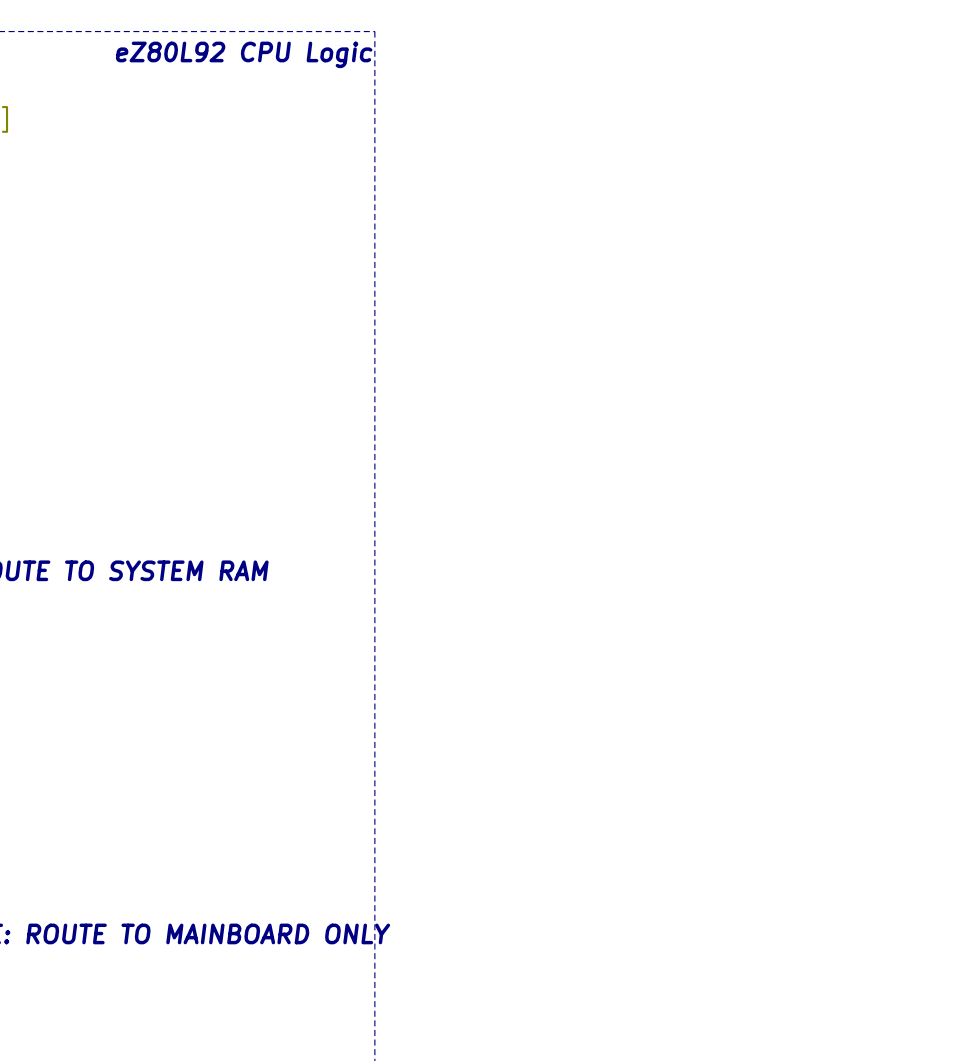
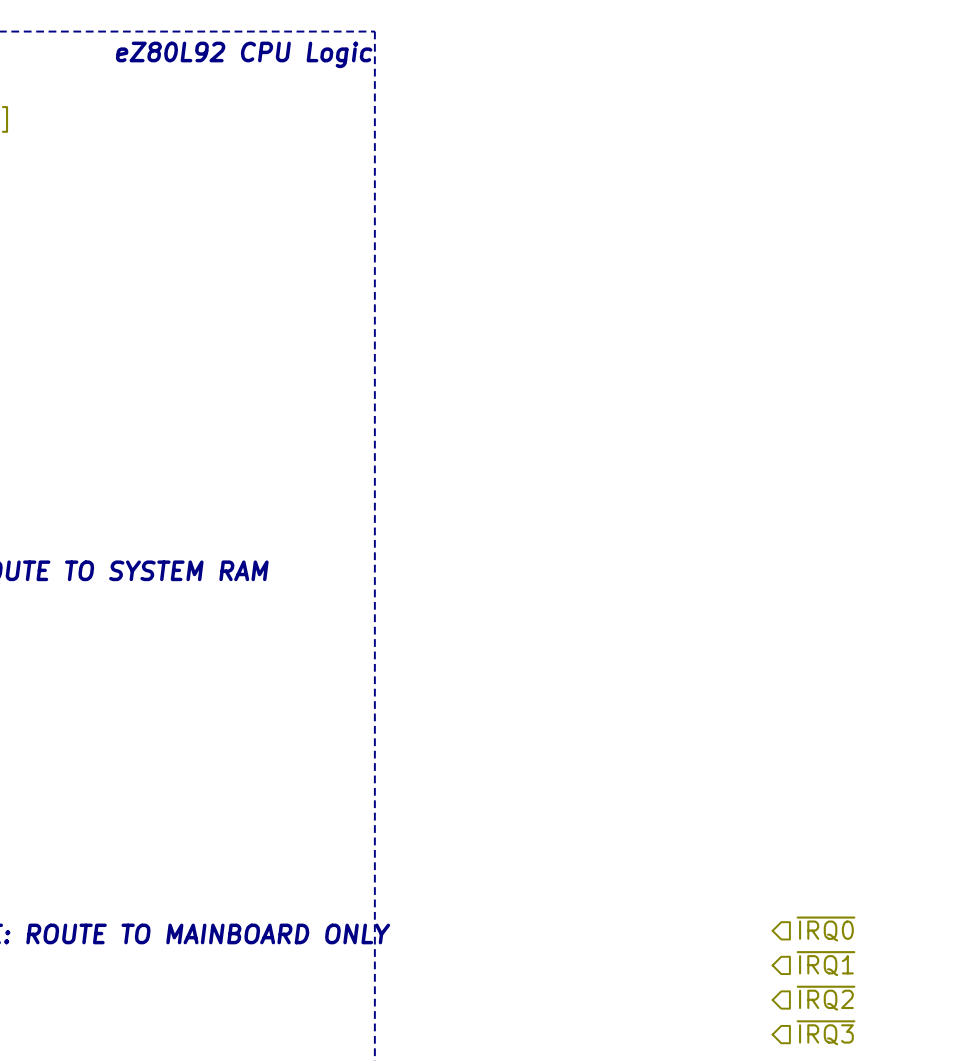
hierarchical label: none -> ~{IRQ0} (826, 929)
hierarchical label: none -> ~{IRQ1} (826, 963)
hierarchical label: none -> ~{IRQ2} (826, 998)
hierarchical label: none -> ~{IRQ3} (826, 1032)

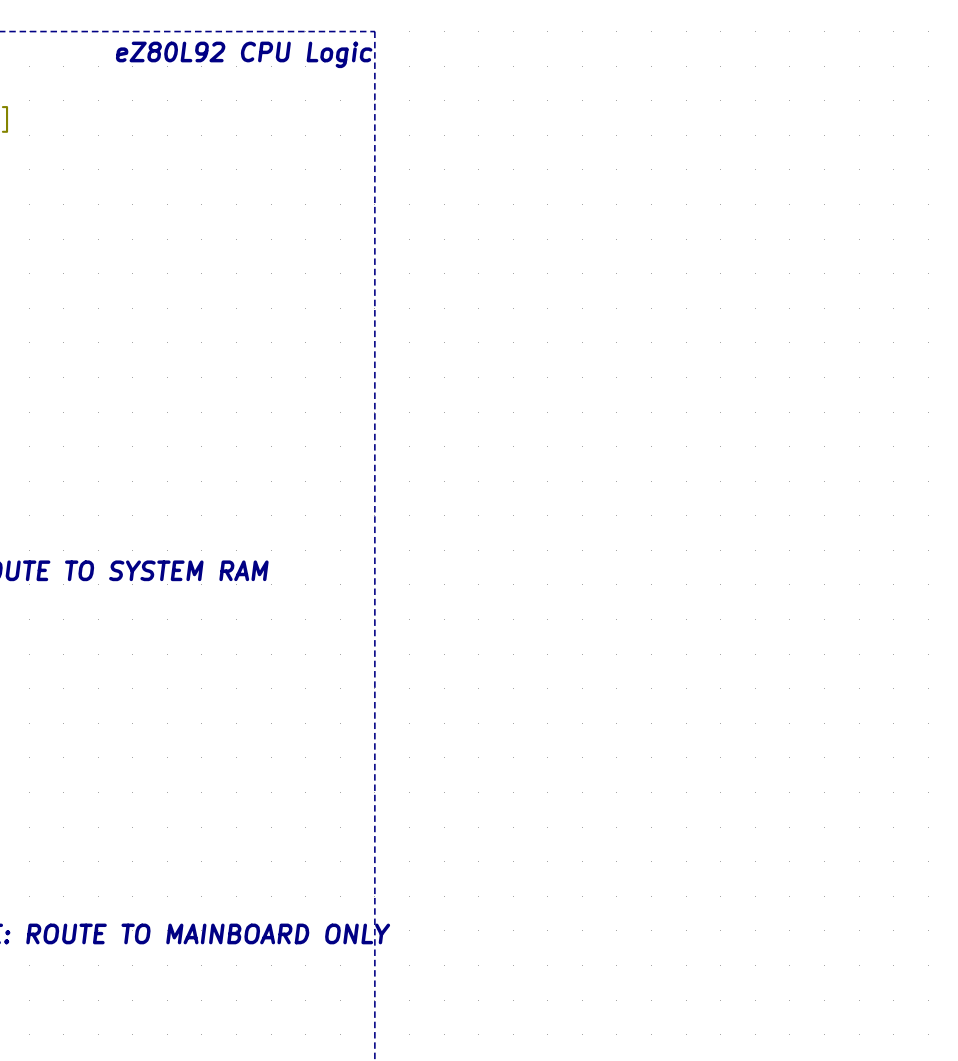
hierarchical label: ~{IRQ0} (826, 929) -> none
hierarchical label: ~{IRQ1} (826, 963) -> none
hierarchical label: ~{IRQ2} (826, 998) -> none
hierarchical label: ~{IRQ3} (826, 1032) -> none

